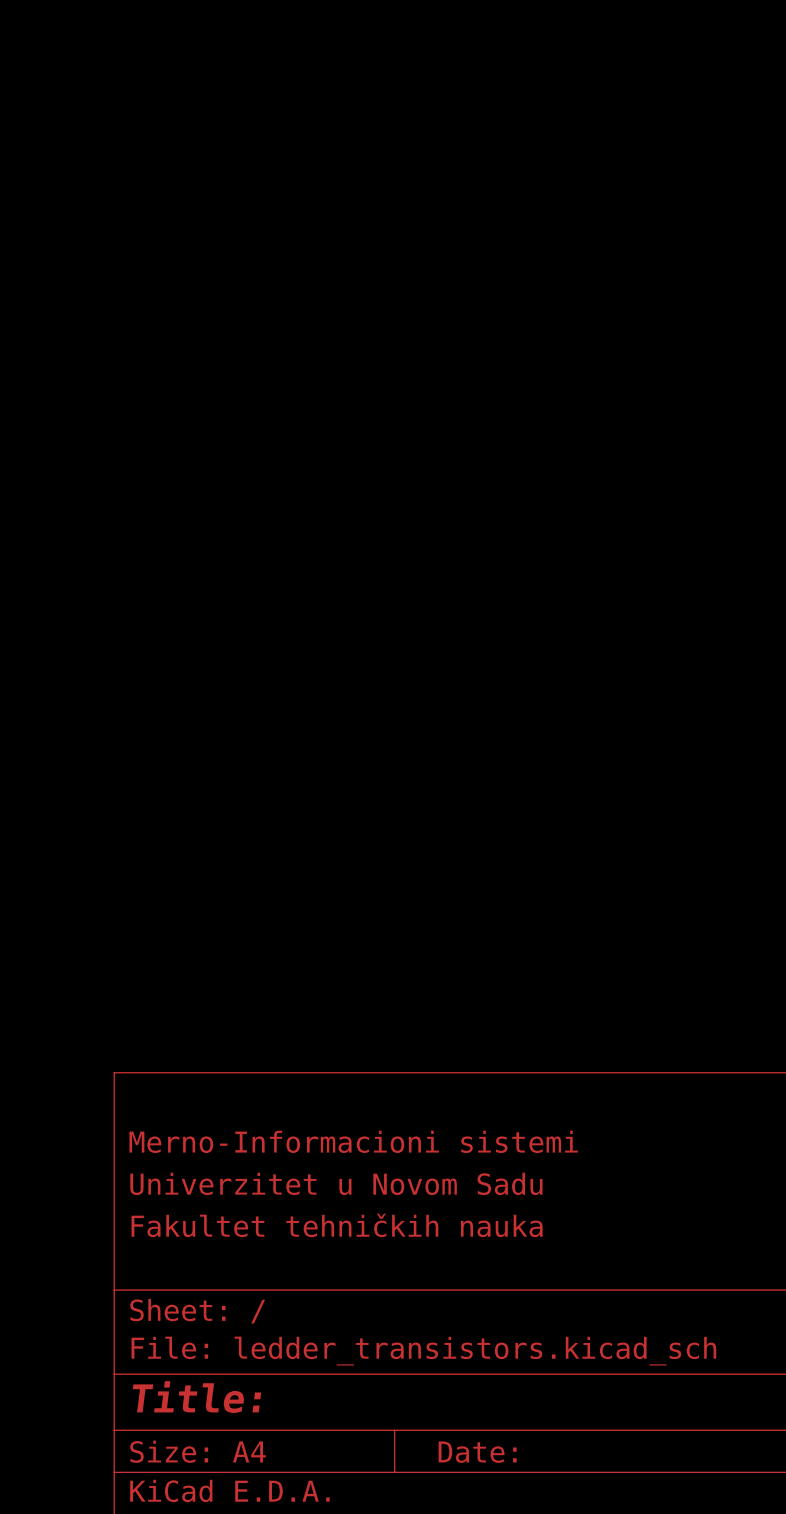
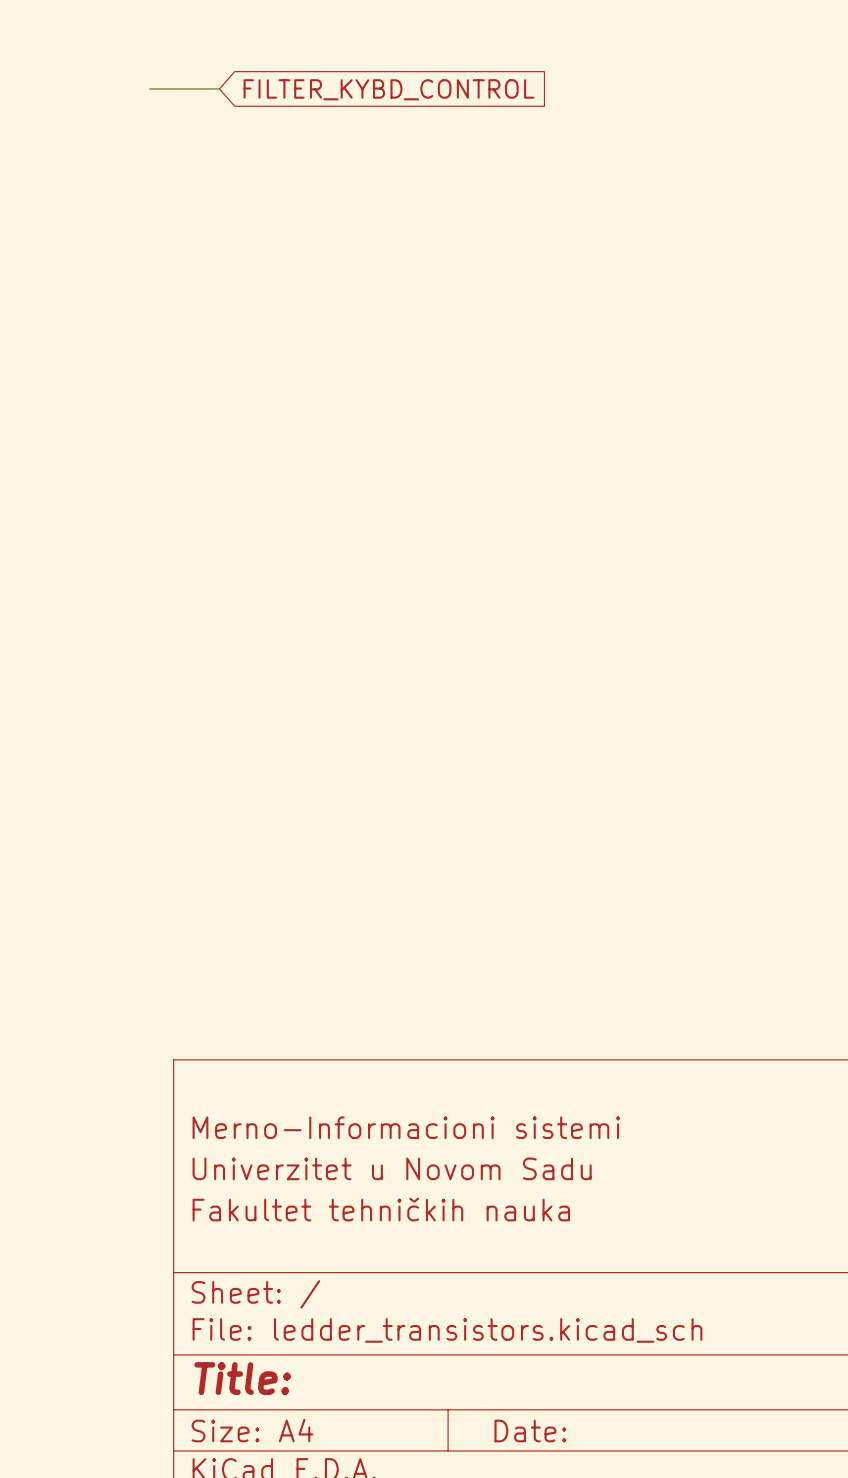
wire: none -> (149, 88) (219, 88)
global label: none -> FILTER_KYBD_CONTROL (389, 89)

